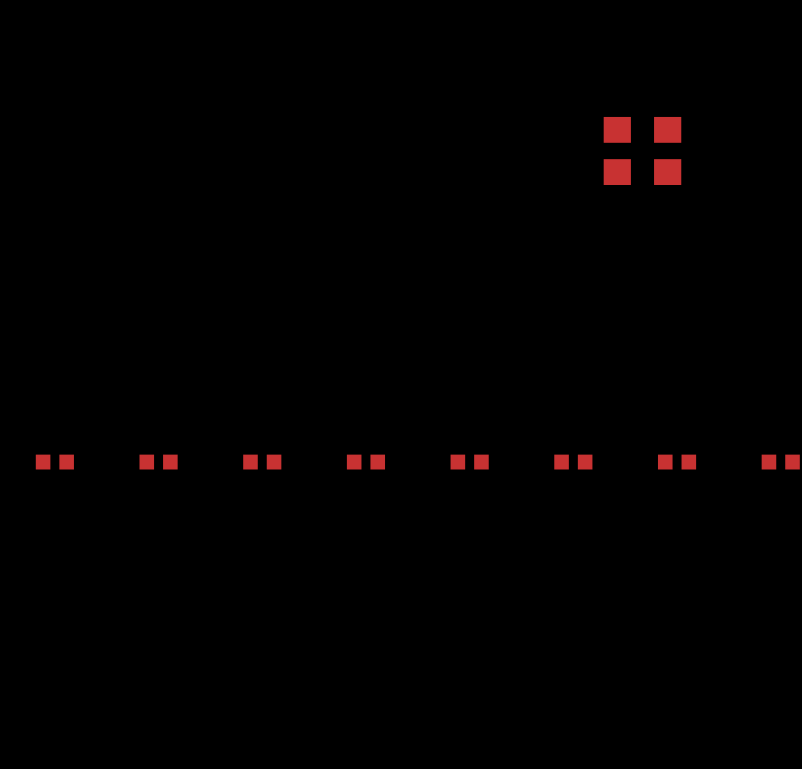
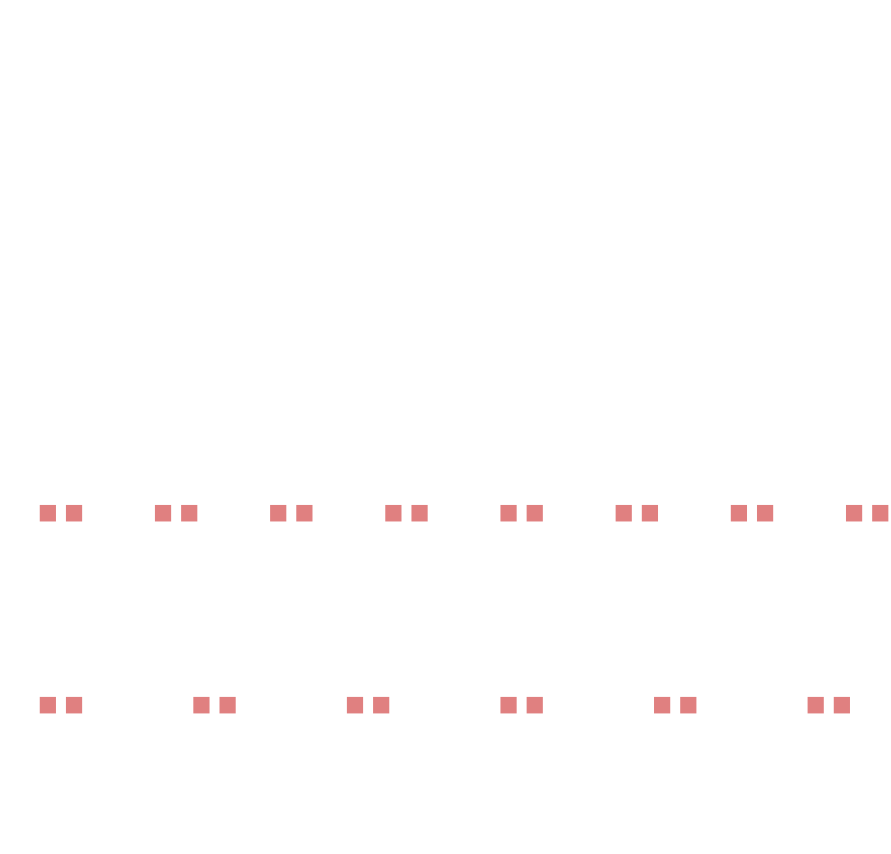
part: (642, 150) -> none
part: none -> (60, 705)
part: none -> (214, 705)
part: none -> (368, 705)
part: none -> (521, 705)
part: none -> (675, 705)
part: none -> (828, 705)

